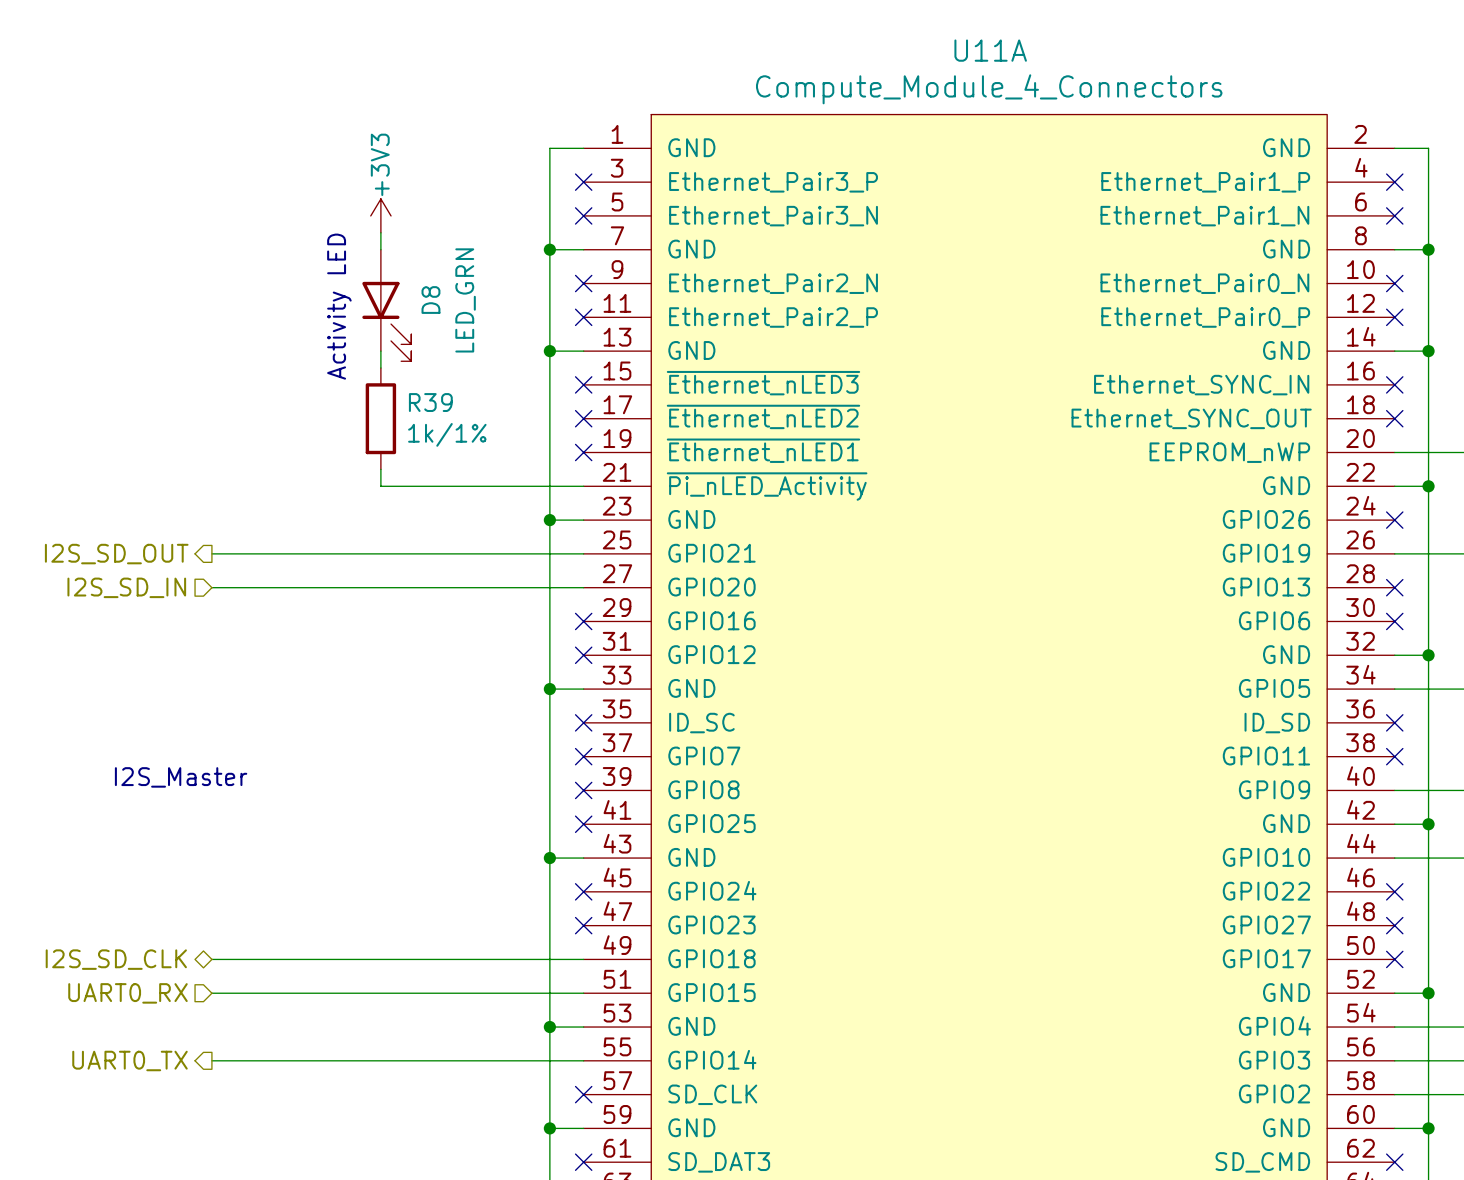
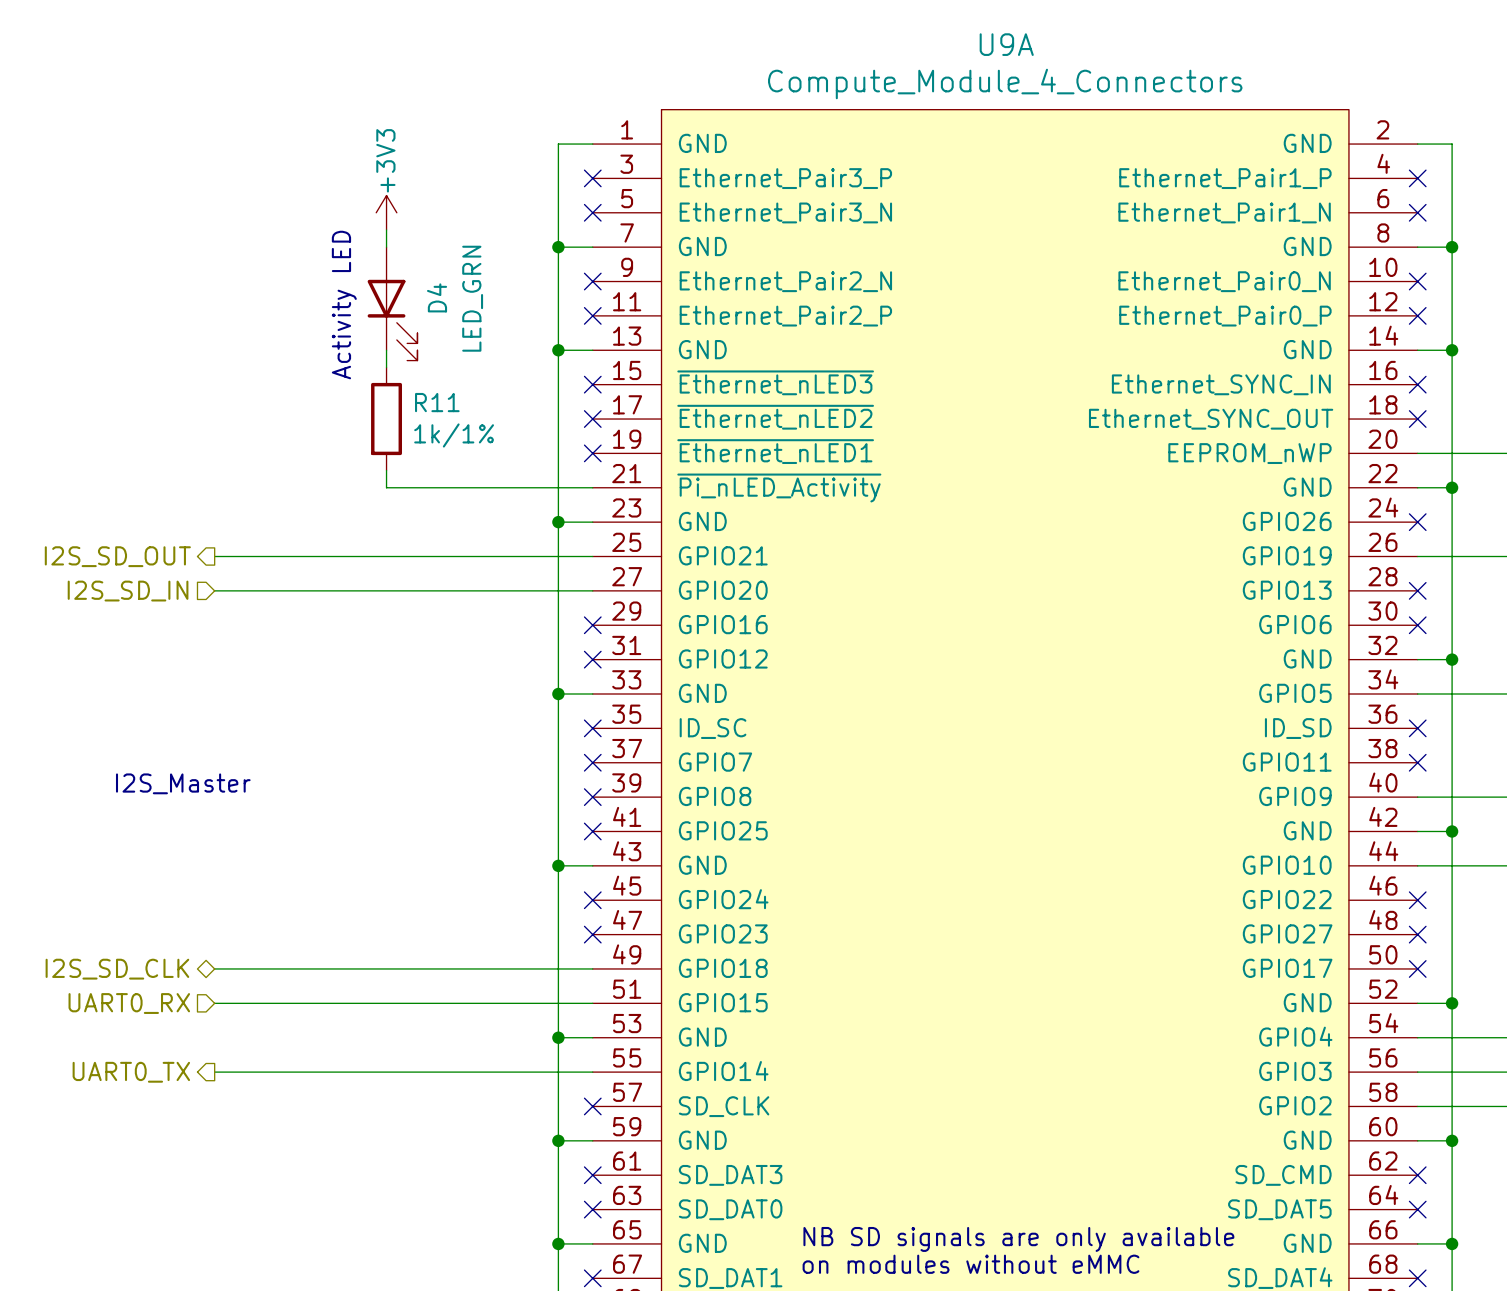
U11A name: U11A (990, 50) -> U9A (1006, 44)
D8 name: D8 (430, 300) -> D4 (437, 297)
R39 name: R39 (430, 402) -> R11 (437, 402)

